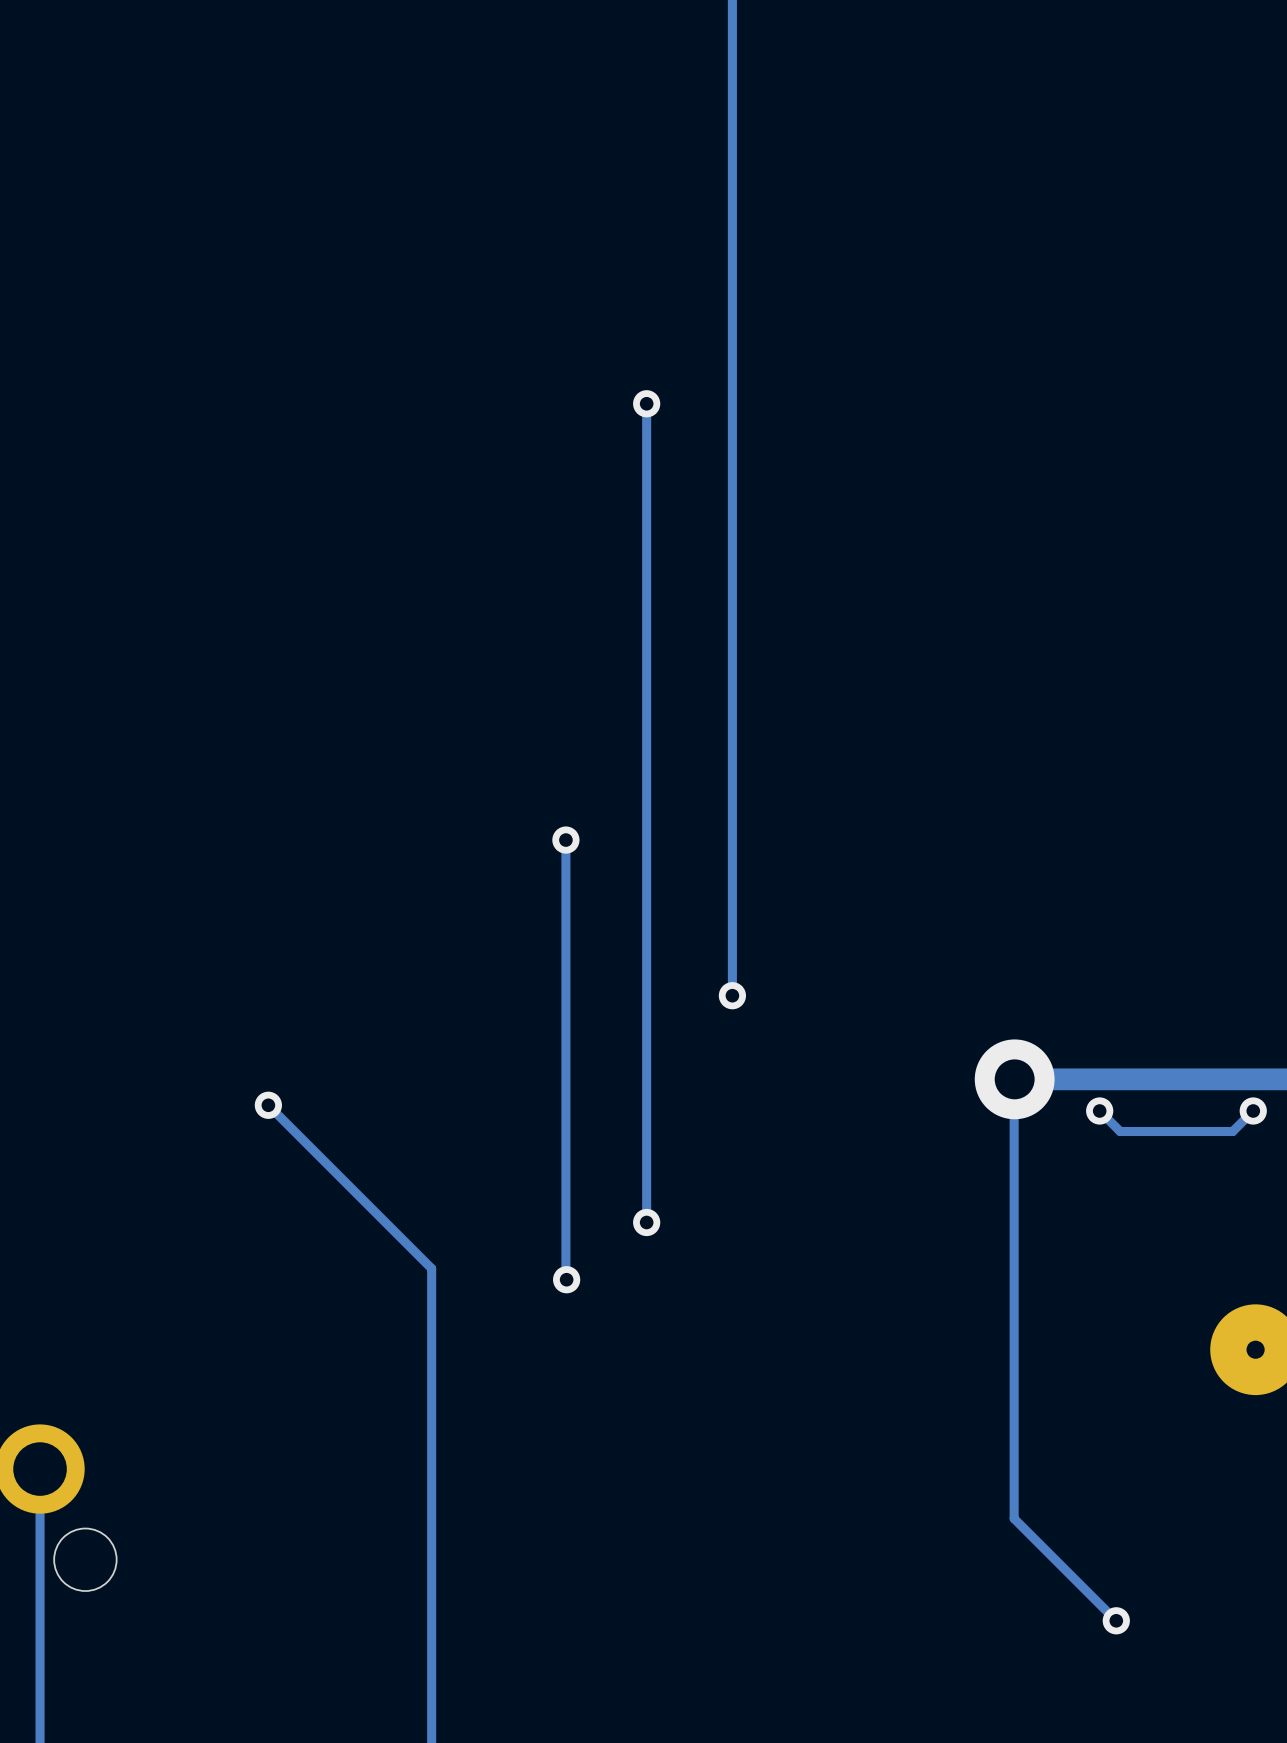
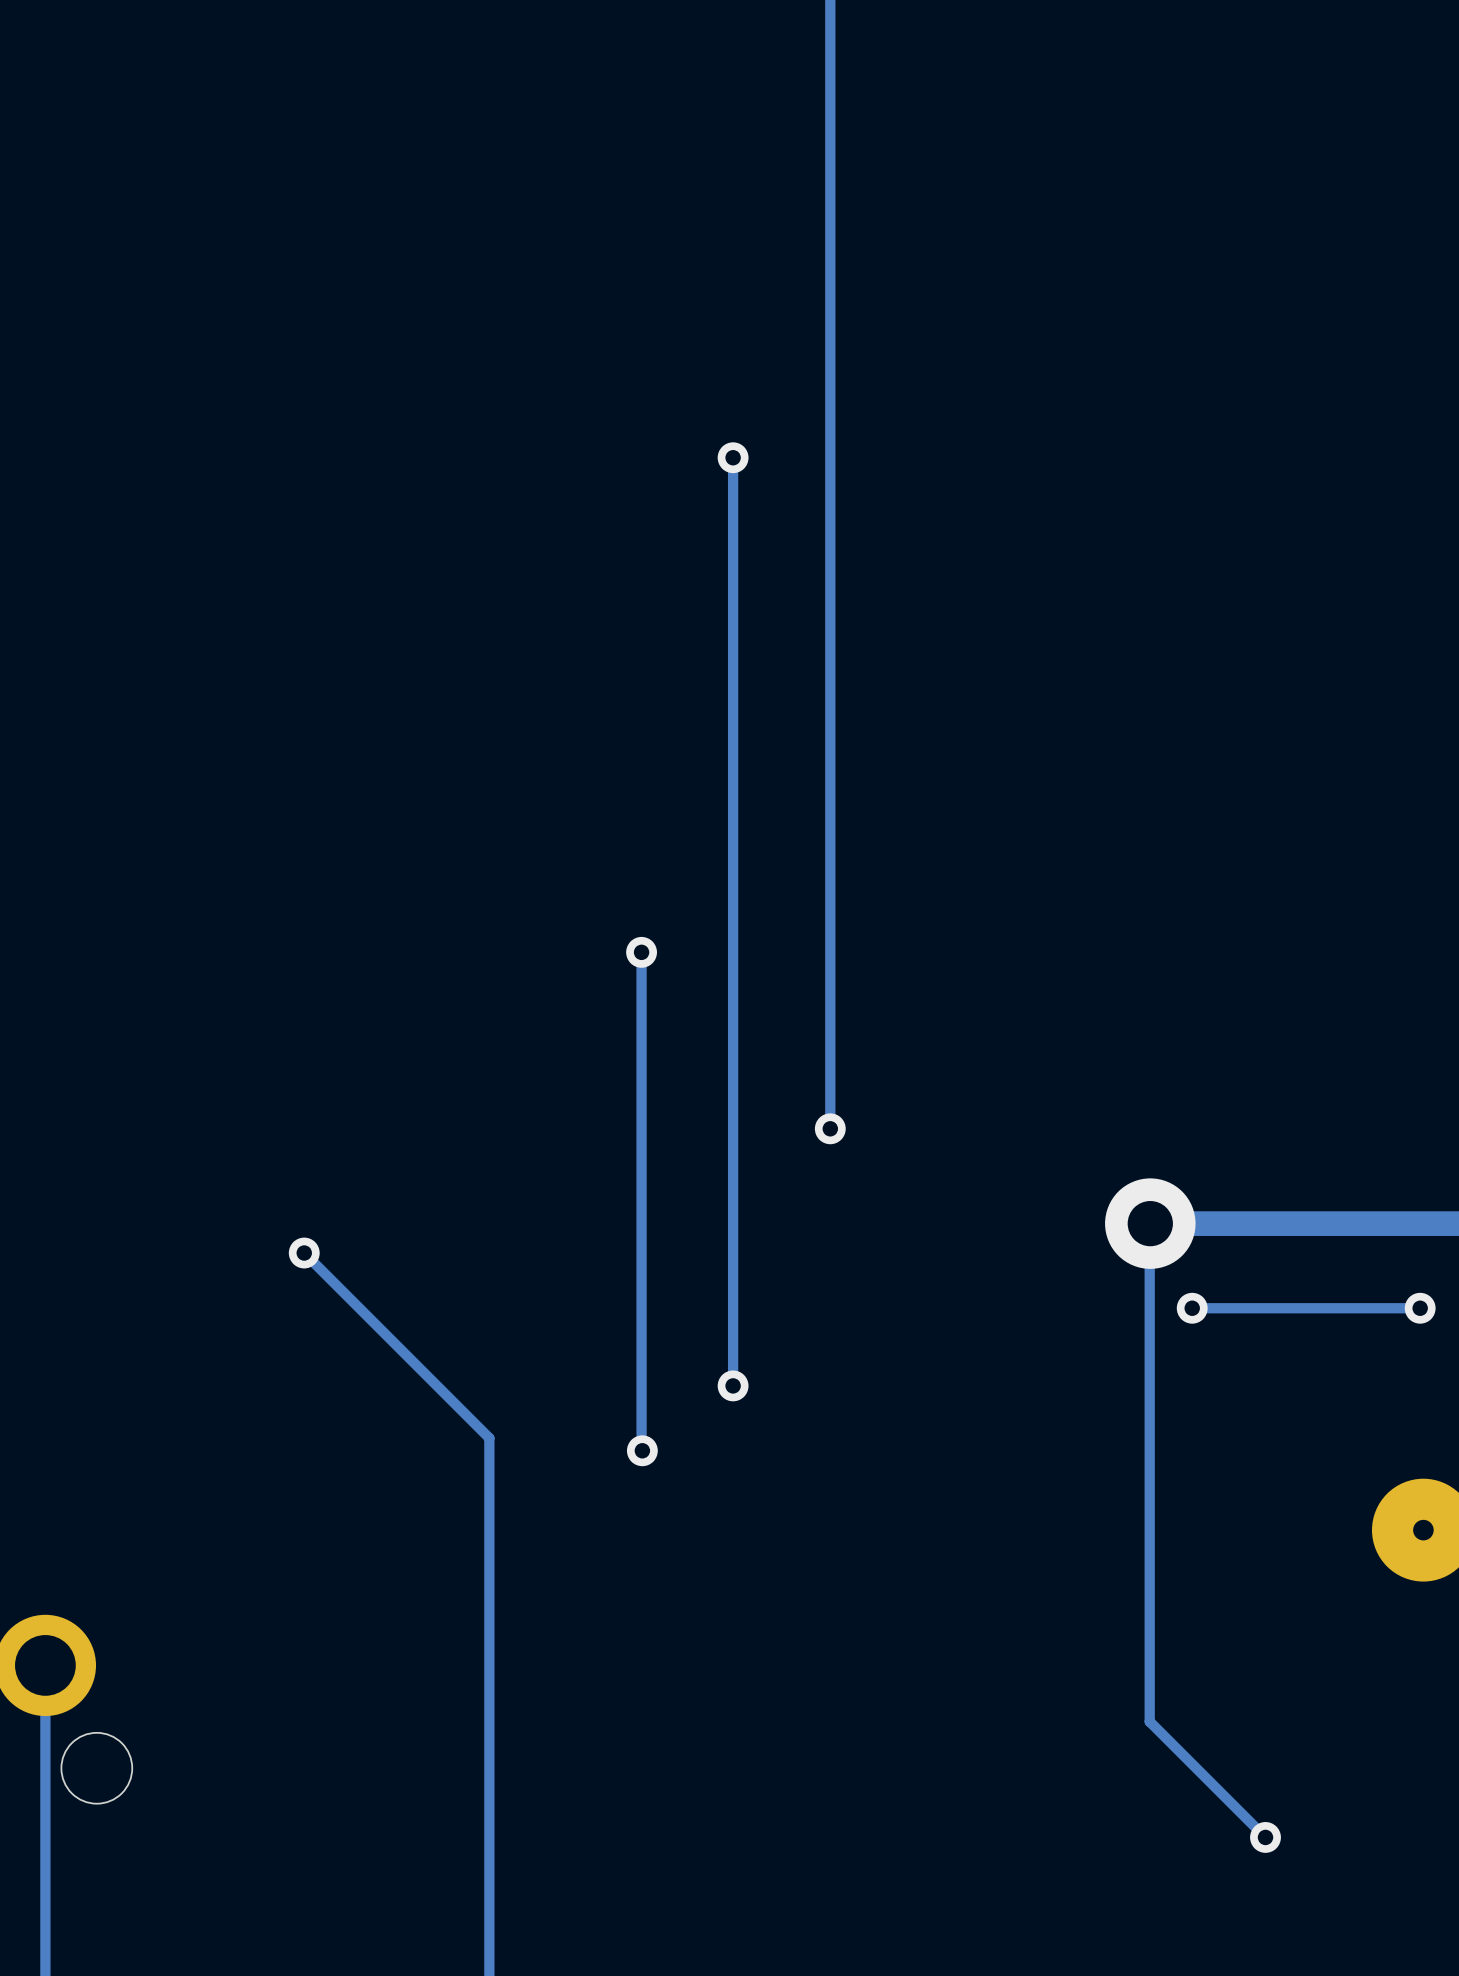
via position: (1099, 1110) -> (1192, 1308)
track: (1253, 1110) (1232, 1131) (1120, 1131) (1099, 1110) -> none
via position: (1253, 1110) -> (1420, 1308)
track: none -> (1420, 1308) (1192, 1308)

